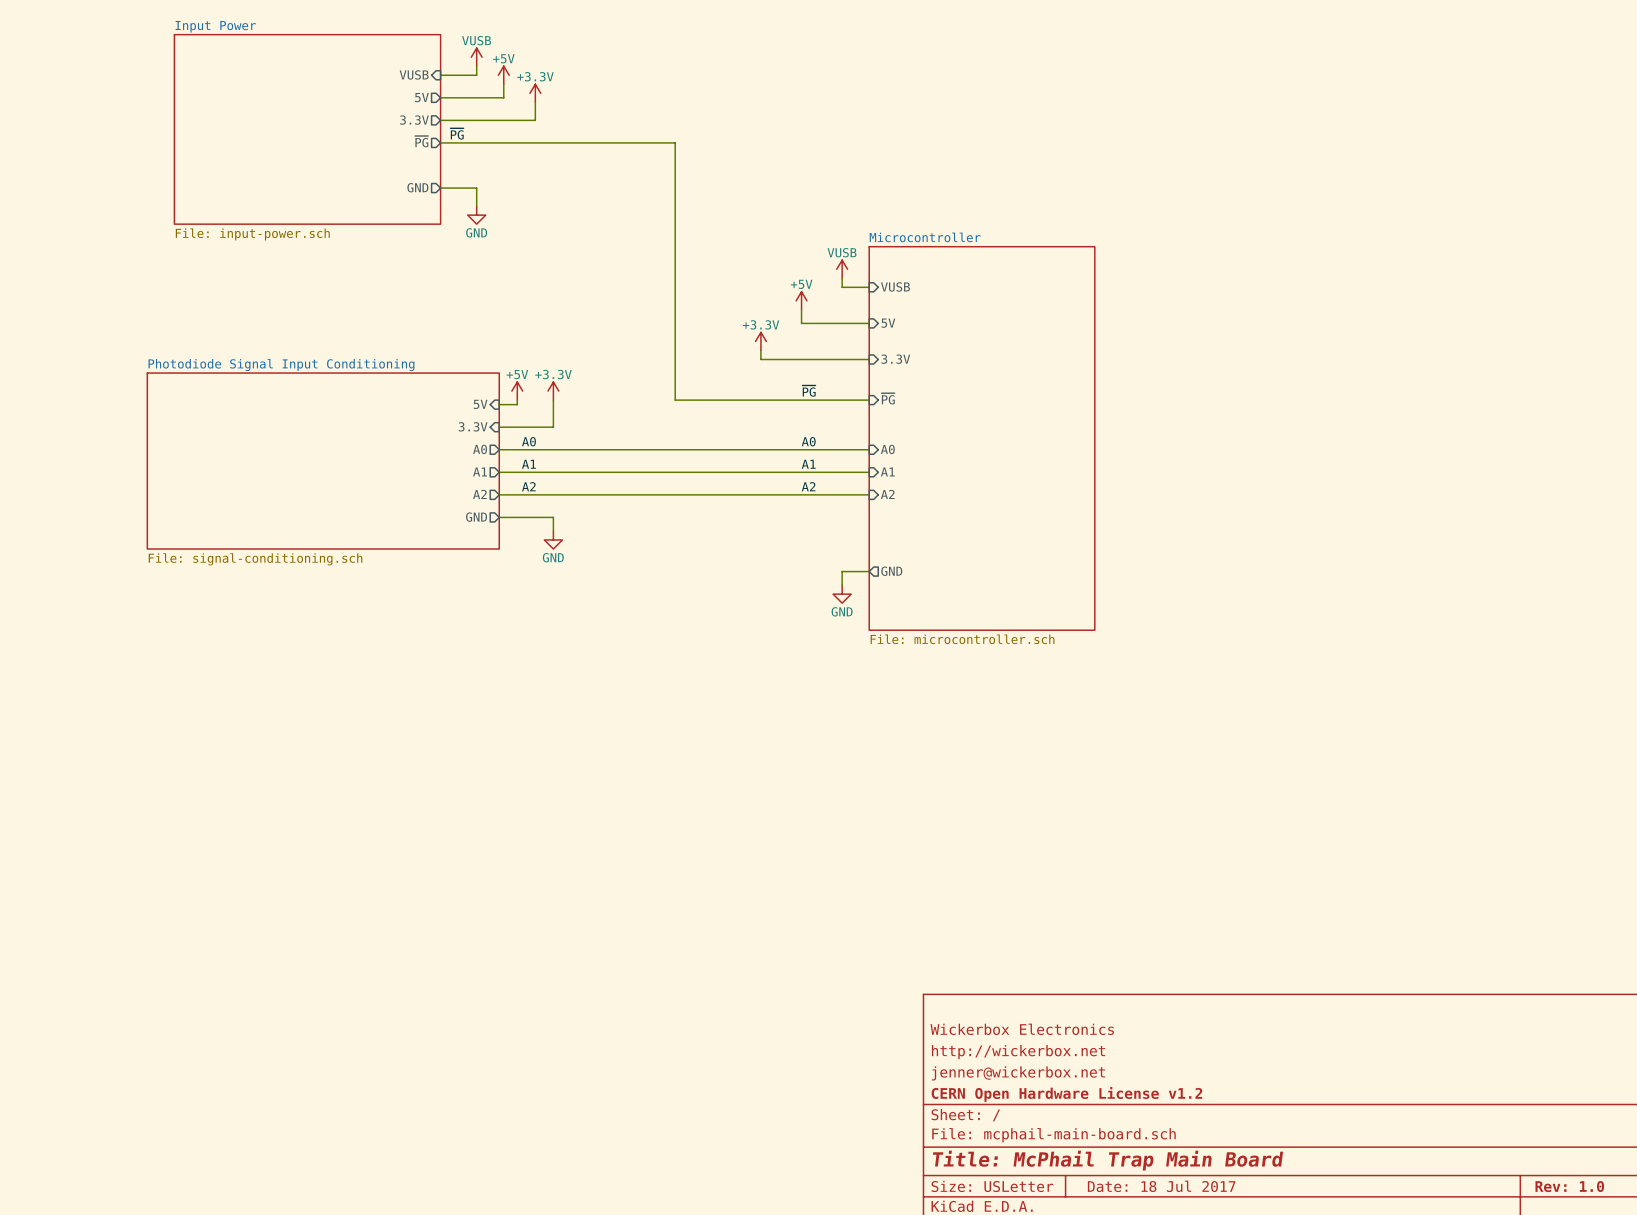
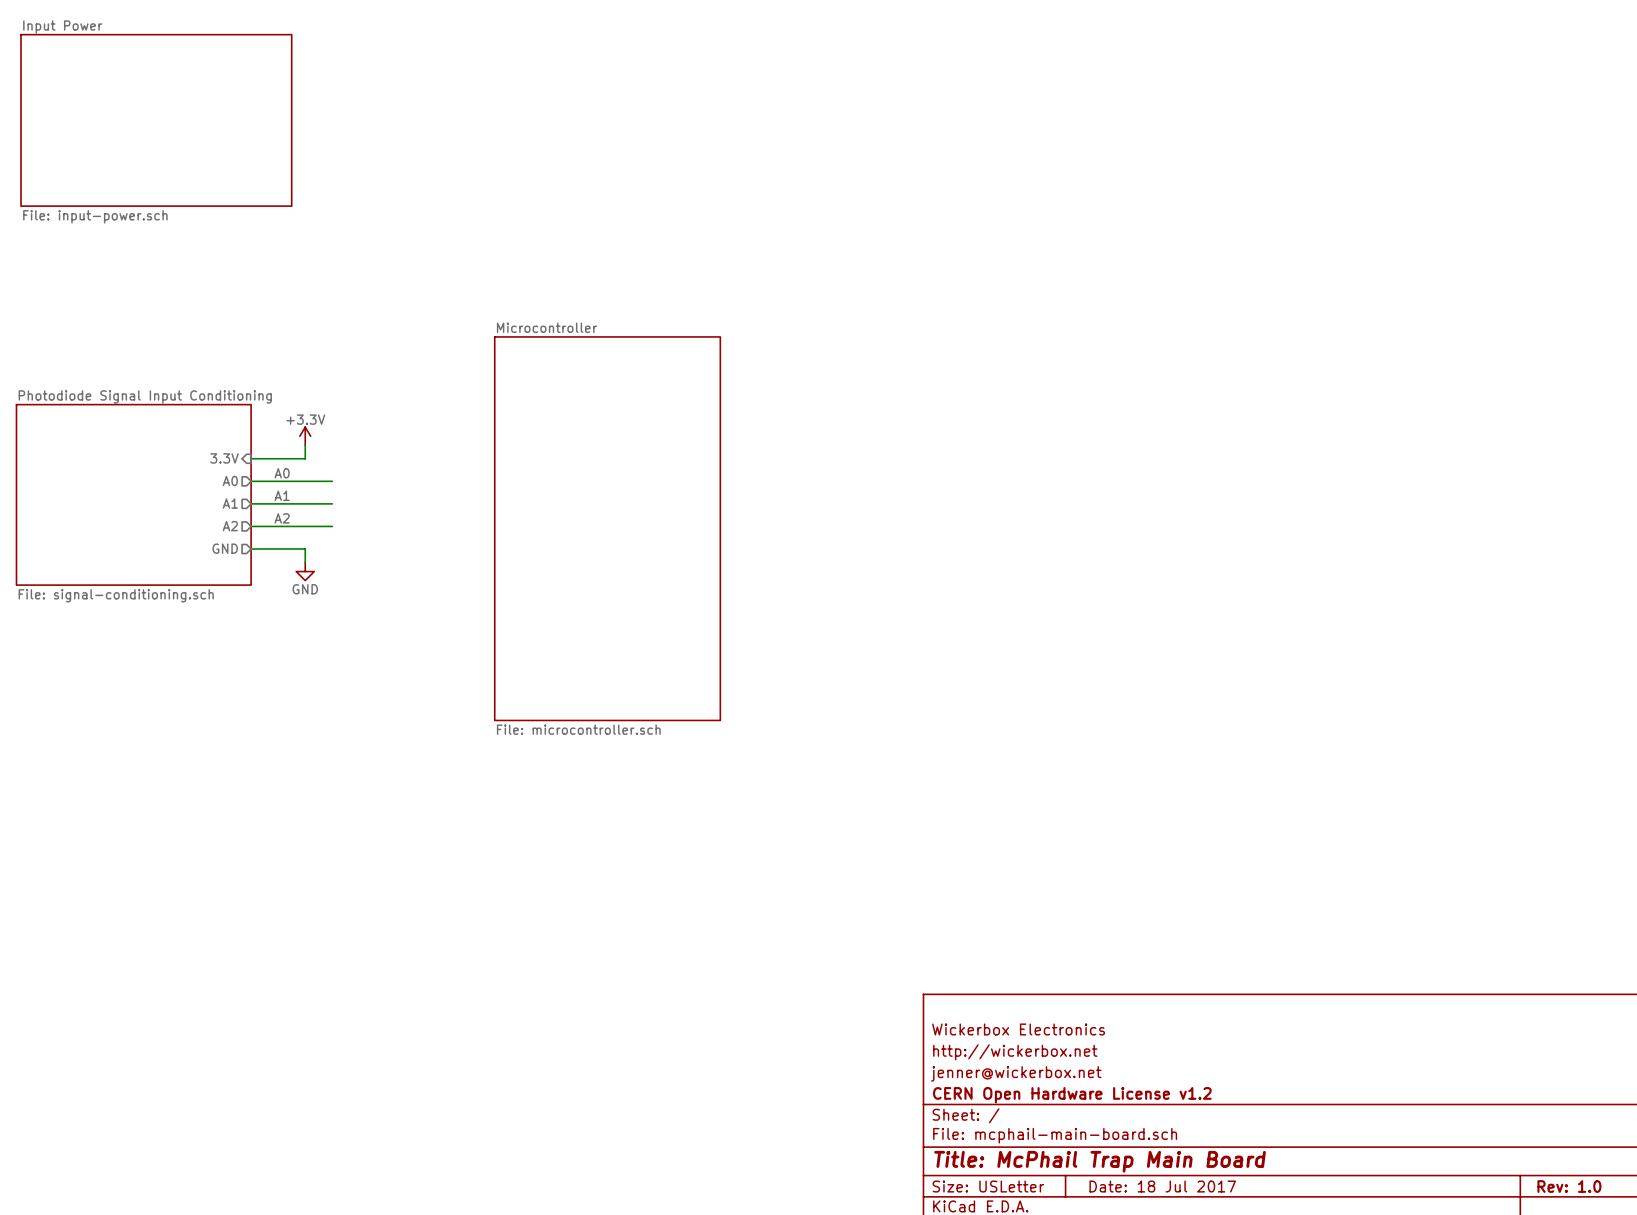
power symbol: VUSB (476, 57) -> none
wire: (476, 66) (476, 75) (440, 75) -> none
sheet pin: VUSB (414, 74) -> none
power symbol: +5V (503, 75) -> none
wire: (503, 84) (503, 97) (440, 97) -> none
power symbol: +3.3V (535, 93) -> none
sheet pin: 5V (421, 97) -> none
wire: (535, 102) (535, 120) (440, 120) -> none
sheet Input Power: none -> File: input-power.sch (156, 120)
sheet pin: 3.3V (414, 120) -> none
sheet Input Power: File: input-power.sch (307, 129) -> none
label: ~{PG} (457, 133) -> none
sheet pin: ~{PG} (421, 141) -> none
wire: (440, 142) (675, 142) (675, 400) (869, 400) -> none
sheet pin: GND (417, 187) -> none
wire: (440, 188) (476, 188) (476, 206) -> none
power symbol: GND (476, 215) -> none
power symbol: VUSB (842, 269) -> none
wire: (842, 278) (842, 287) (869, 287) -> none
sheet pin: VUSB (895, 286) -> none
power symbol: +5V (801, 300) -> none
wire: (801, 309) (801, 323) (869, 323) -> none
sheet pin: 5V (888, 323) -> none
power symbol: +3.3V (760, 341) -> none
wire: (760, 350) (760, 359) (869, 359) -> none
sheet pin: 3.3V (895, 359) -> none
power symbol: +5V (517, 391) -> none
power symbol: +3.3V (553, 391) -> none
label: ~{PG} (809, 391) -> none
sheet pin: ~{PG} (888, 398) -> none
wire: (517, 400) (517, 404) (499, 404) -> none
wire: (553, 400) (553, 427) (499, 427) -> none
sheet pin: 5V (480, 404) -> none
sheet pin: 3.3V (473, 426) -> none
power symbol: none -> +3.3V (305, 436)
sheet Microcontroller: File: microcontroller.sch (982, 438) -> none
label: A0 (528, 441) -> none
label: A0 (808, 441) -> none
wire: none -> (305, 445) (305, 458) (251, 458)
sheet pin: A0 (480, 449) -> none
wire: (499, 449) (869, 449) -> none
sheet pin: A0 (887, 449) -> none
sheet pin: none -> 3.3V (224, 458)
sheet Photodiode Signal Input Conditioning: File: signal-conditioning.sch (323, 461) -> none
label: A1 (528, 464) -> none
label: A1 (808, 464) -> none
sheet pin: A1 (480, 471) -> none
sheet pin: A1 (887, 471) -> none
wire: (499, 472) (869, 472) -> none
label: none -> A0 (282, 473)
sheet pin: none -> A0 (230, 480)
wire: none -> (251, 481) (332, 481)
label: A2 (528, 486) -> none
label: A2 (808, 486) -> none
sheet Photodiode Signal Input Conditioning: none -> File: signal-conditioning.sch (133, 494)
sheet pin: A2 (479, 494) -> none
wire: (499, 494) (869, 494) -> none
sheet pin: A2 (887, 494) -> none
label: none -> A1 (282, 495)
sheet pin: none -> A1 (230, 503)
wire: none -> (251, 503) (332, 503)
sheet pin: GND (476, 517) -> none
wire: (499, 517) (553, 517) (553, 530) -> none
label: none -> A2 (282, 518)
sheet pin: none -> A2 (230, 526)
wire: none -> (251, 526) (332, 526)
sheet Microcontroller: none -> File: microcontroller.sch (607, 528)
power symbol: GND (553, 539) -> none
sheet pin: none -> GND (225, 548)
power symbol: none -> GND (305, 571)
wire: (869, 571) (842, 571) (842, 585) -> none
sheet pin: GND (891, 571) -> none
power symbol: GND (842, 594) -> none

